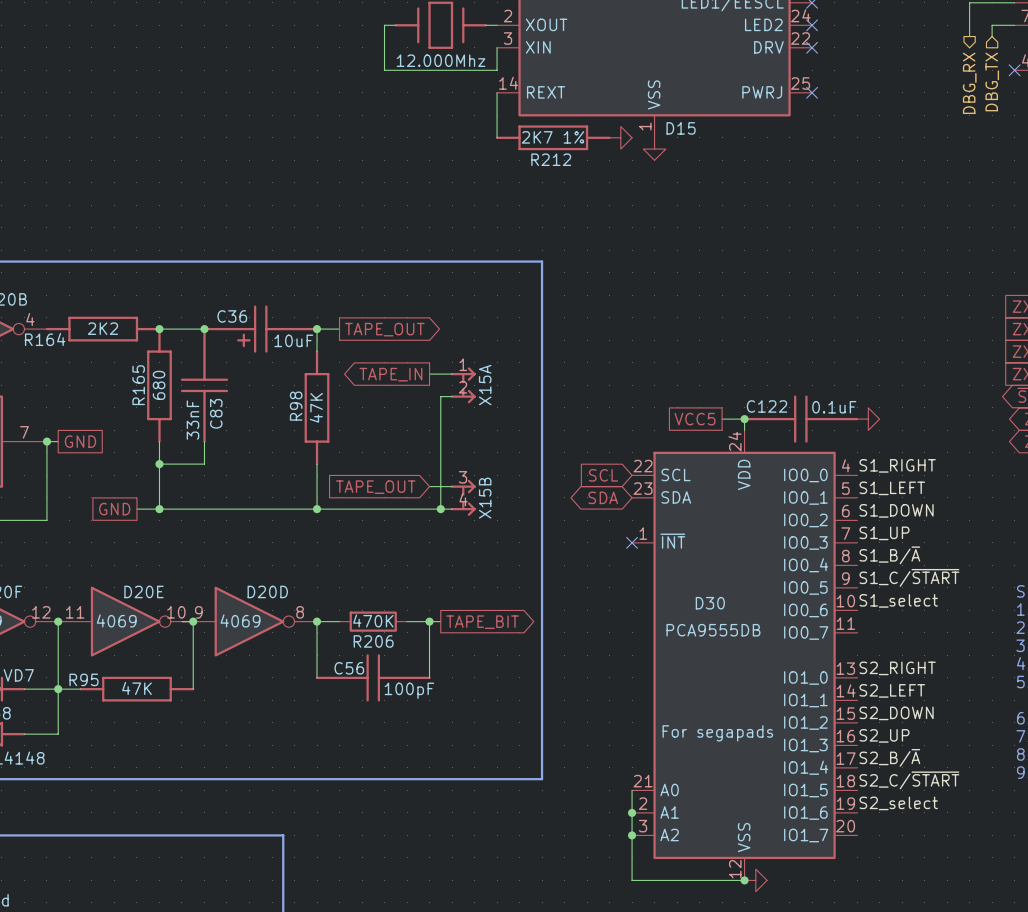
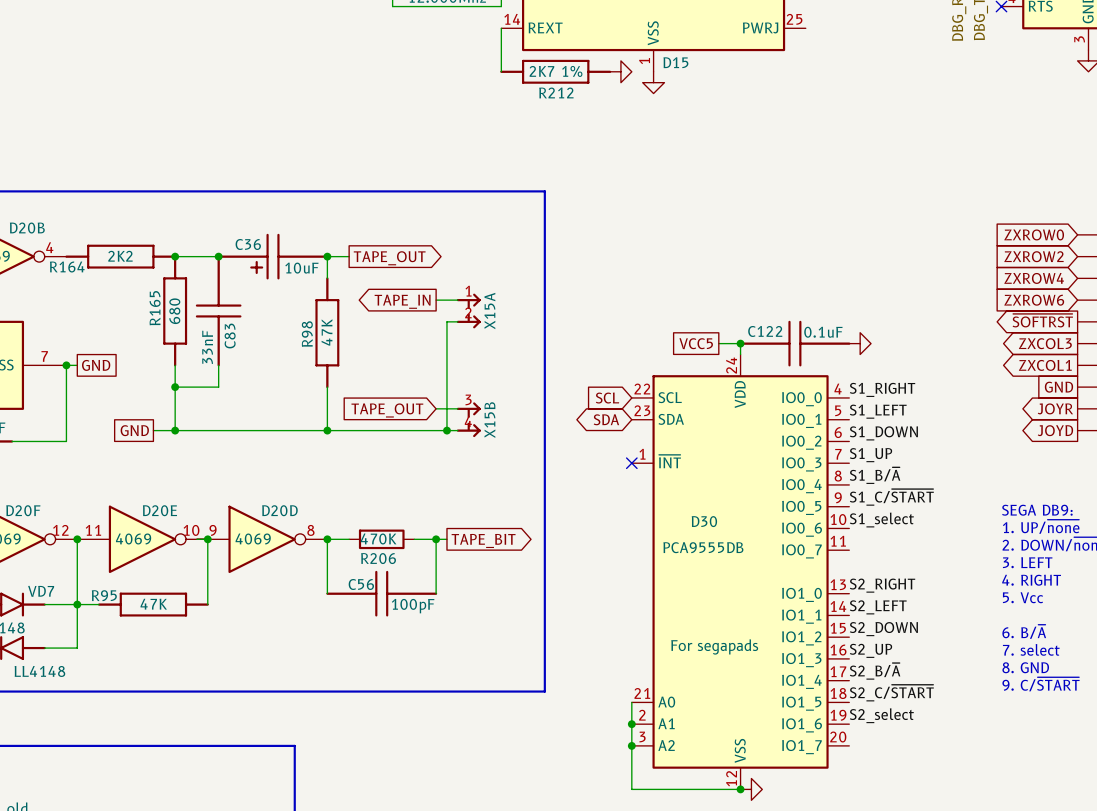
no-connect mark: (812, 92) -> none

